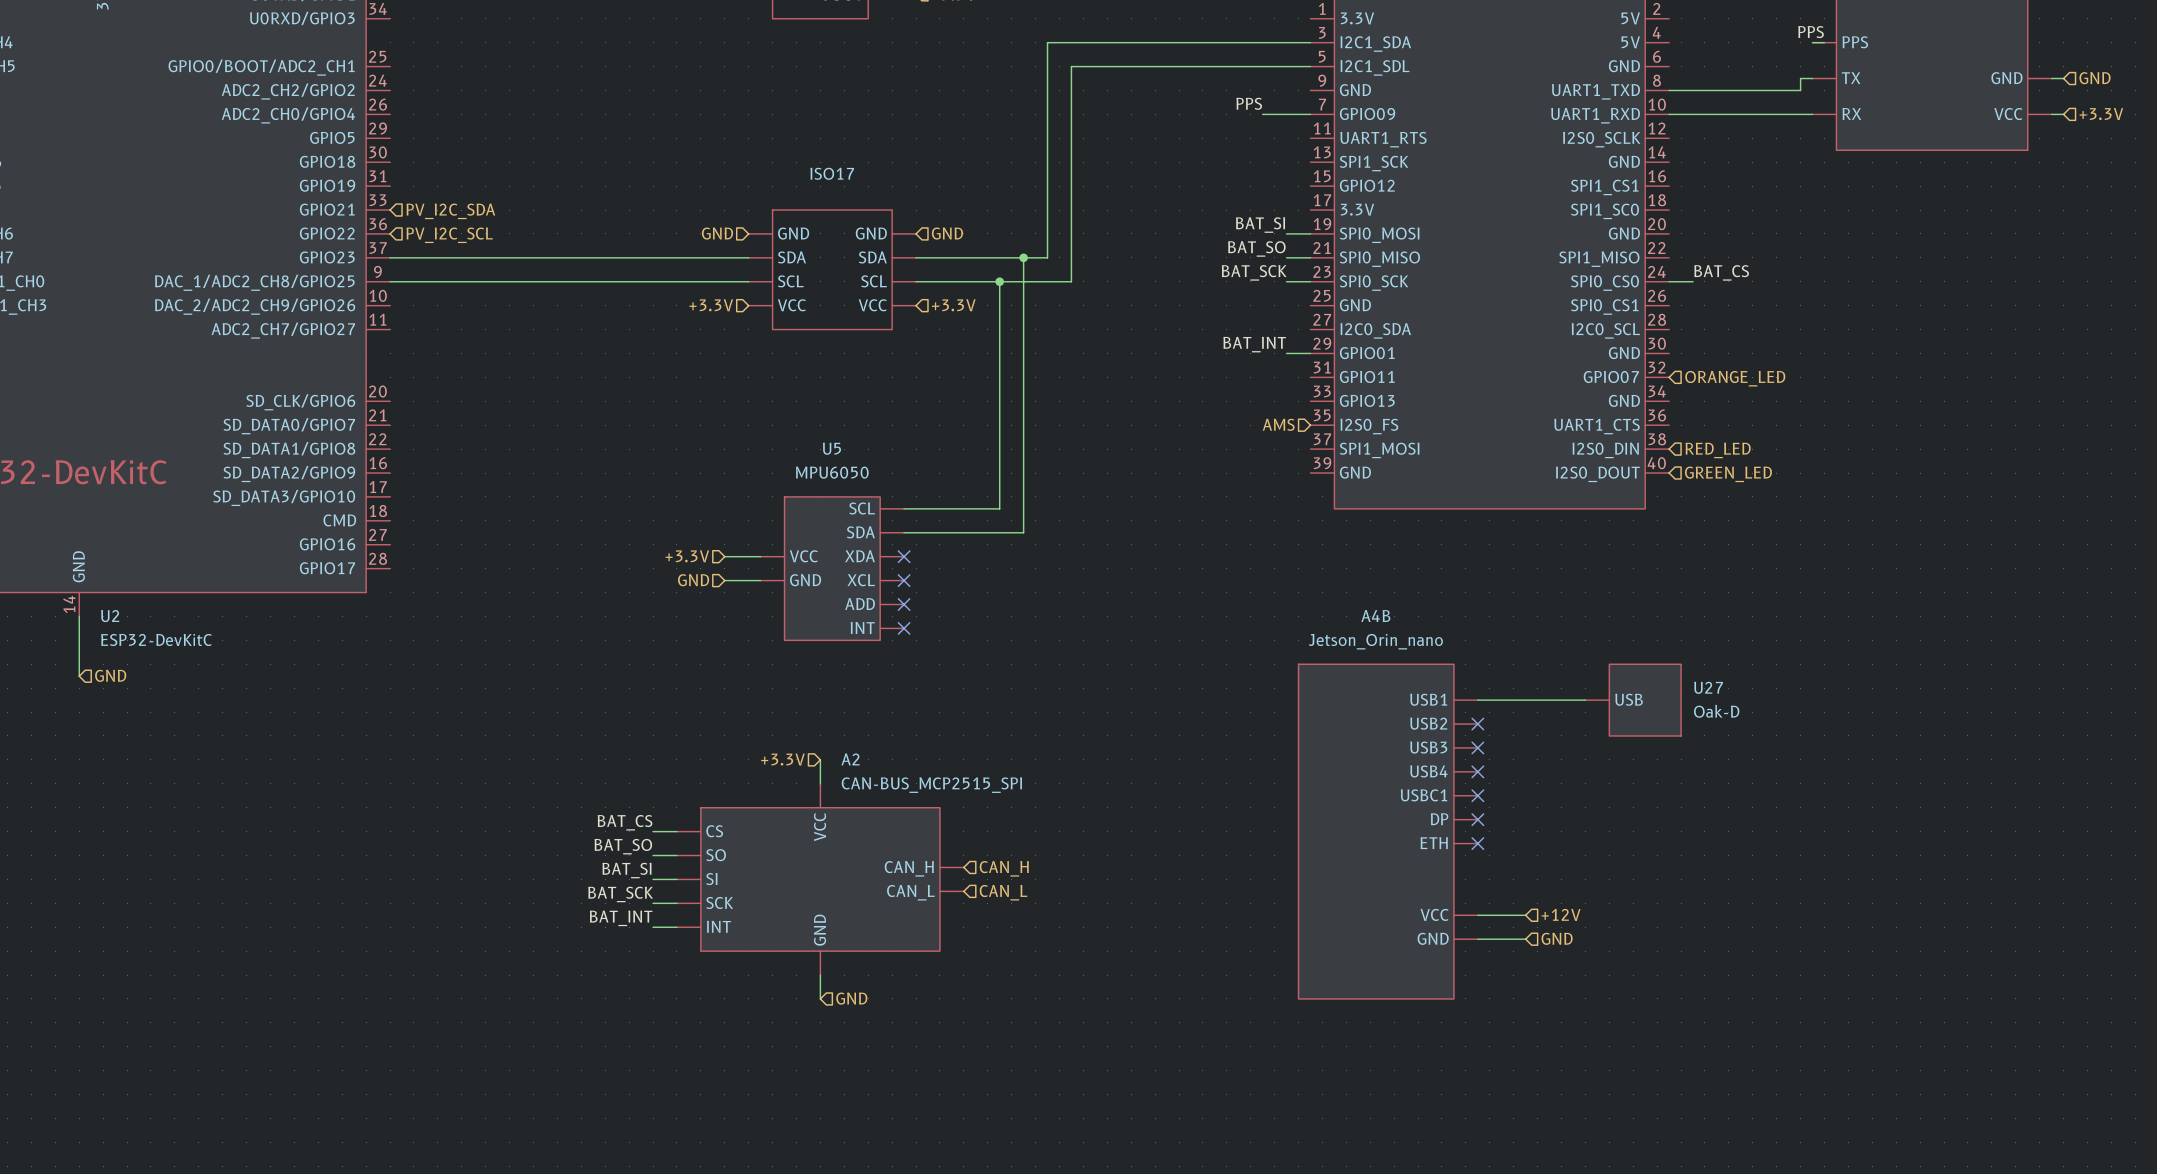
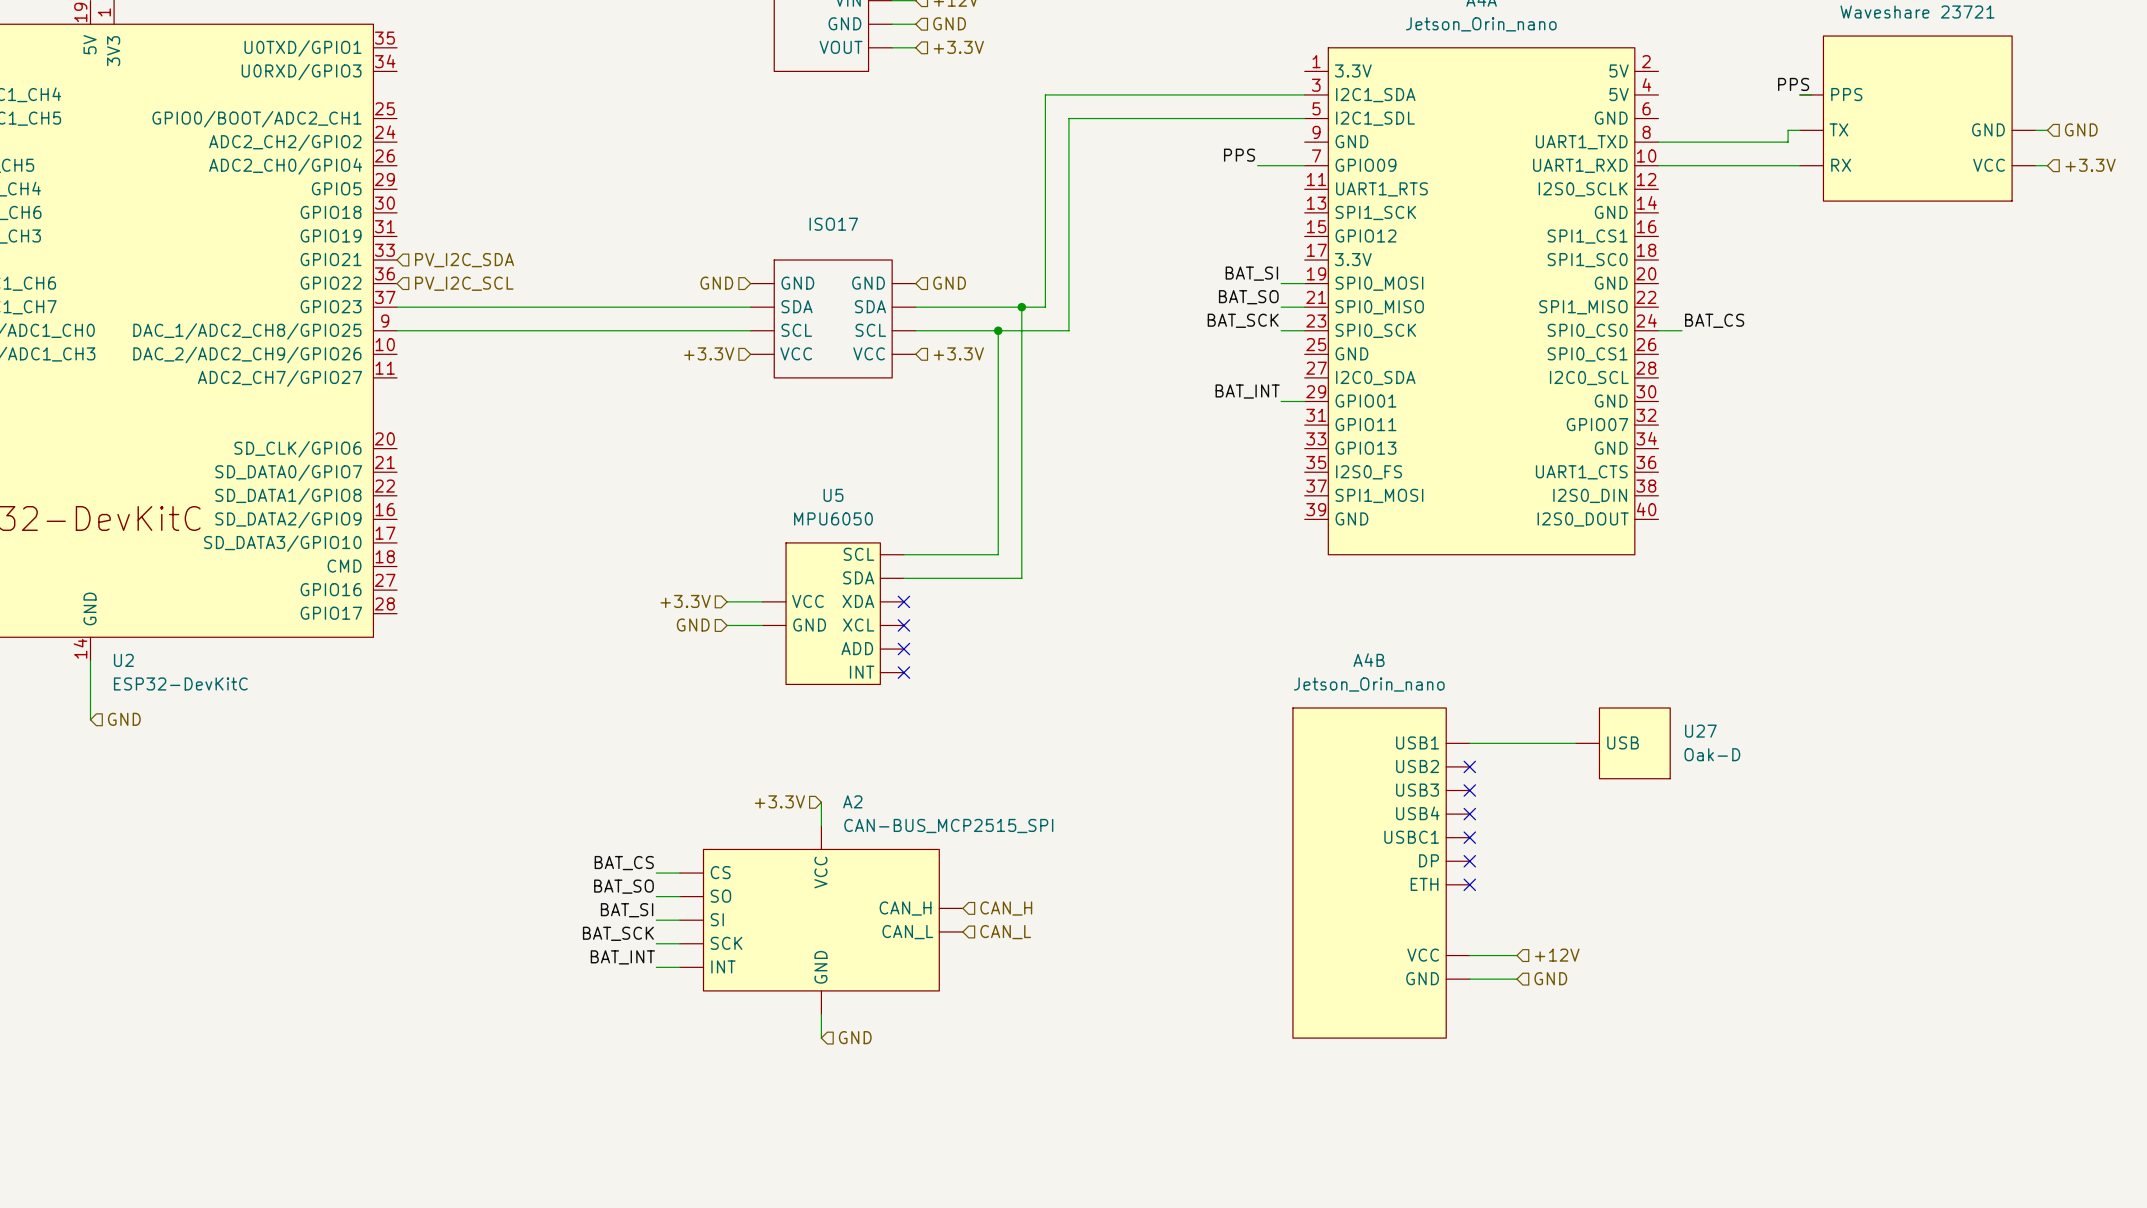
hierarchical label: ORANGE_LED (1735, 378) -> none
hierarchical label: AMS (1278, 424) -> none
hierarchical label: RED_LED (1718, 450) -> none
hierarchical label: GREEN_LED (1728, 474) -> none

